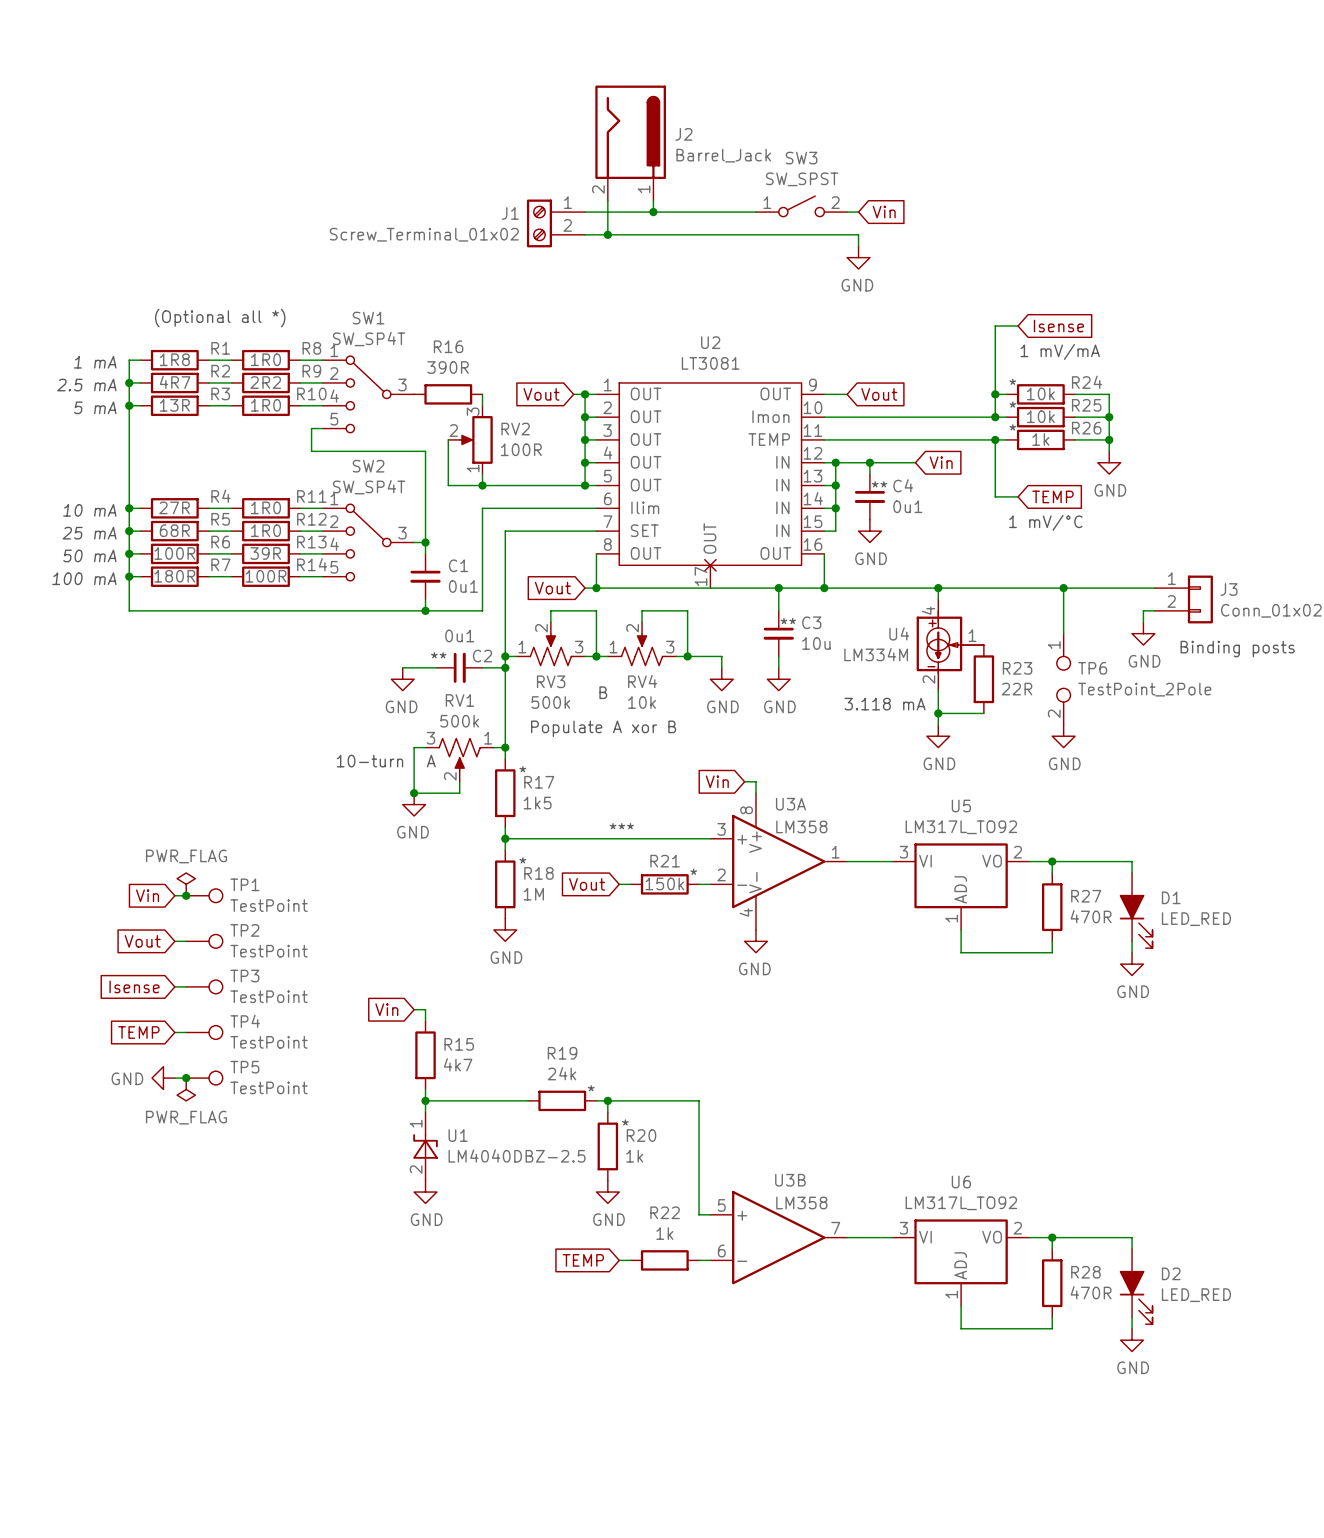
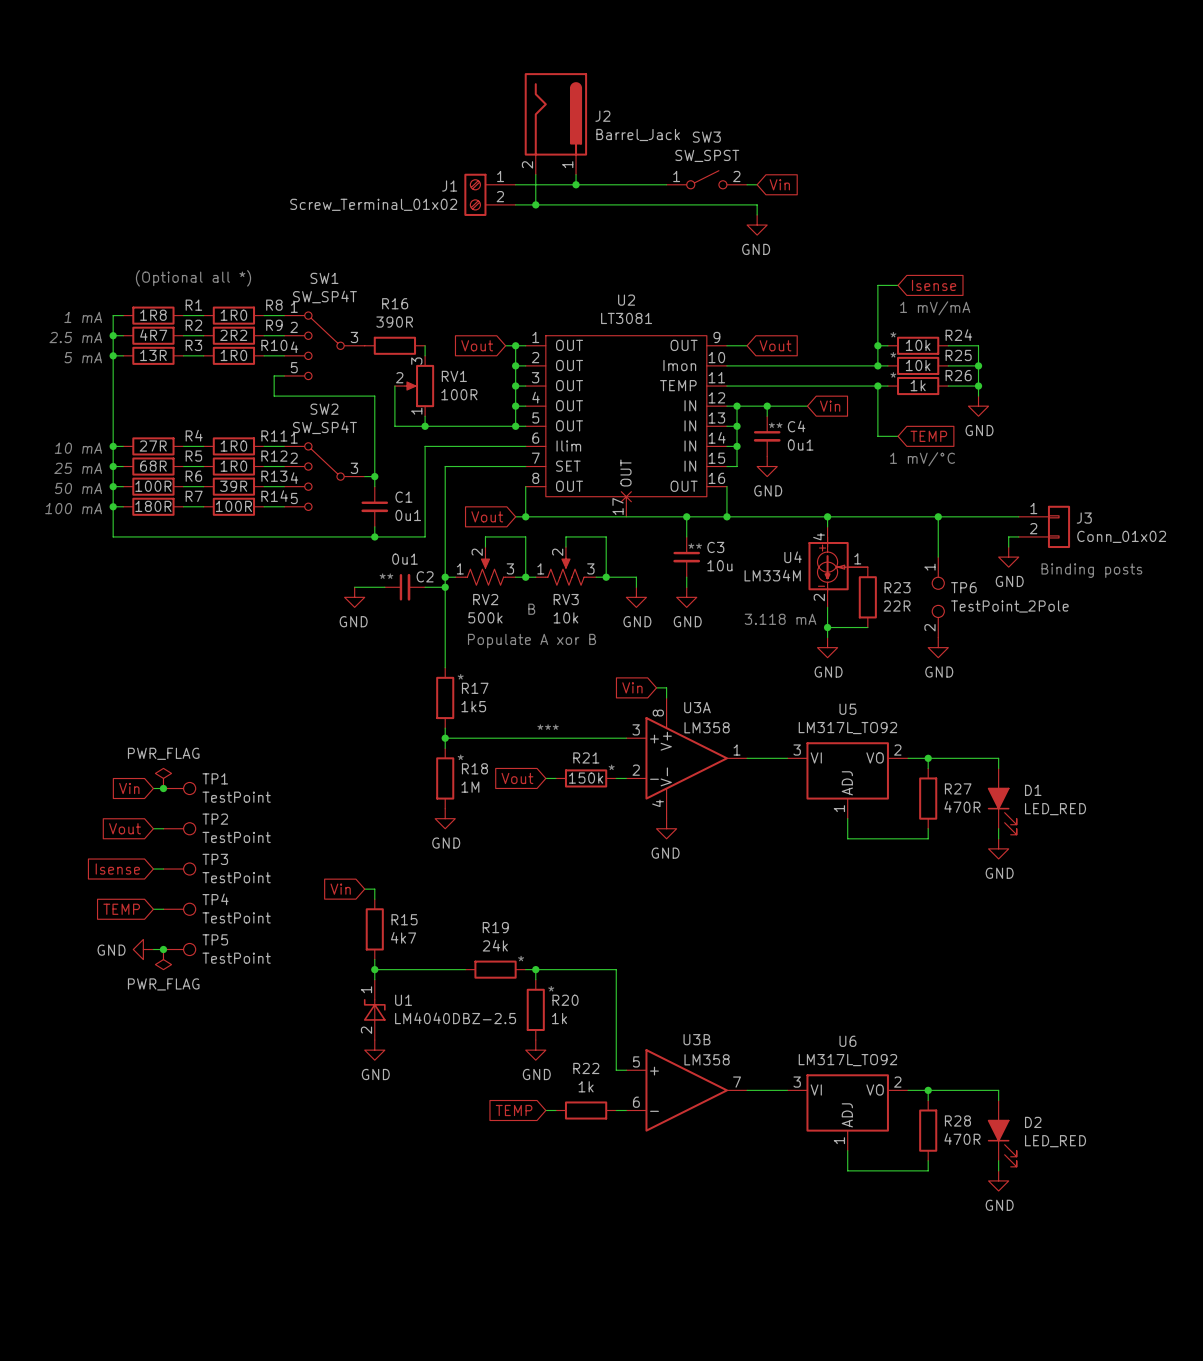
RV2 name: RV2 (515, 429) -> RV1 (454, 376)
RV3 name: RV3 (551, 681) -> RV2 (485, 599)
RV4 name: RV4 (642, 681) -> RV3 (566, 599)
wire: (425, 747) (414, 747) (414, 793) (459, 793) (459, 781) -> none
wire: (493, 747) (505, 747) -> none
junction: (505, 747) -> none
RV1: 500k (459, 760) -> none
text: 10-turn (369, 761) -> none
text: A (431, 761) -> none
junction: (414, 793) -> none
power symbol: GND (414, 804) -> none

